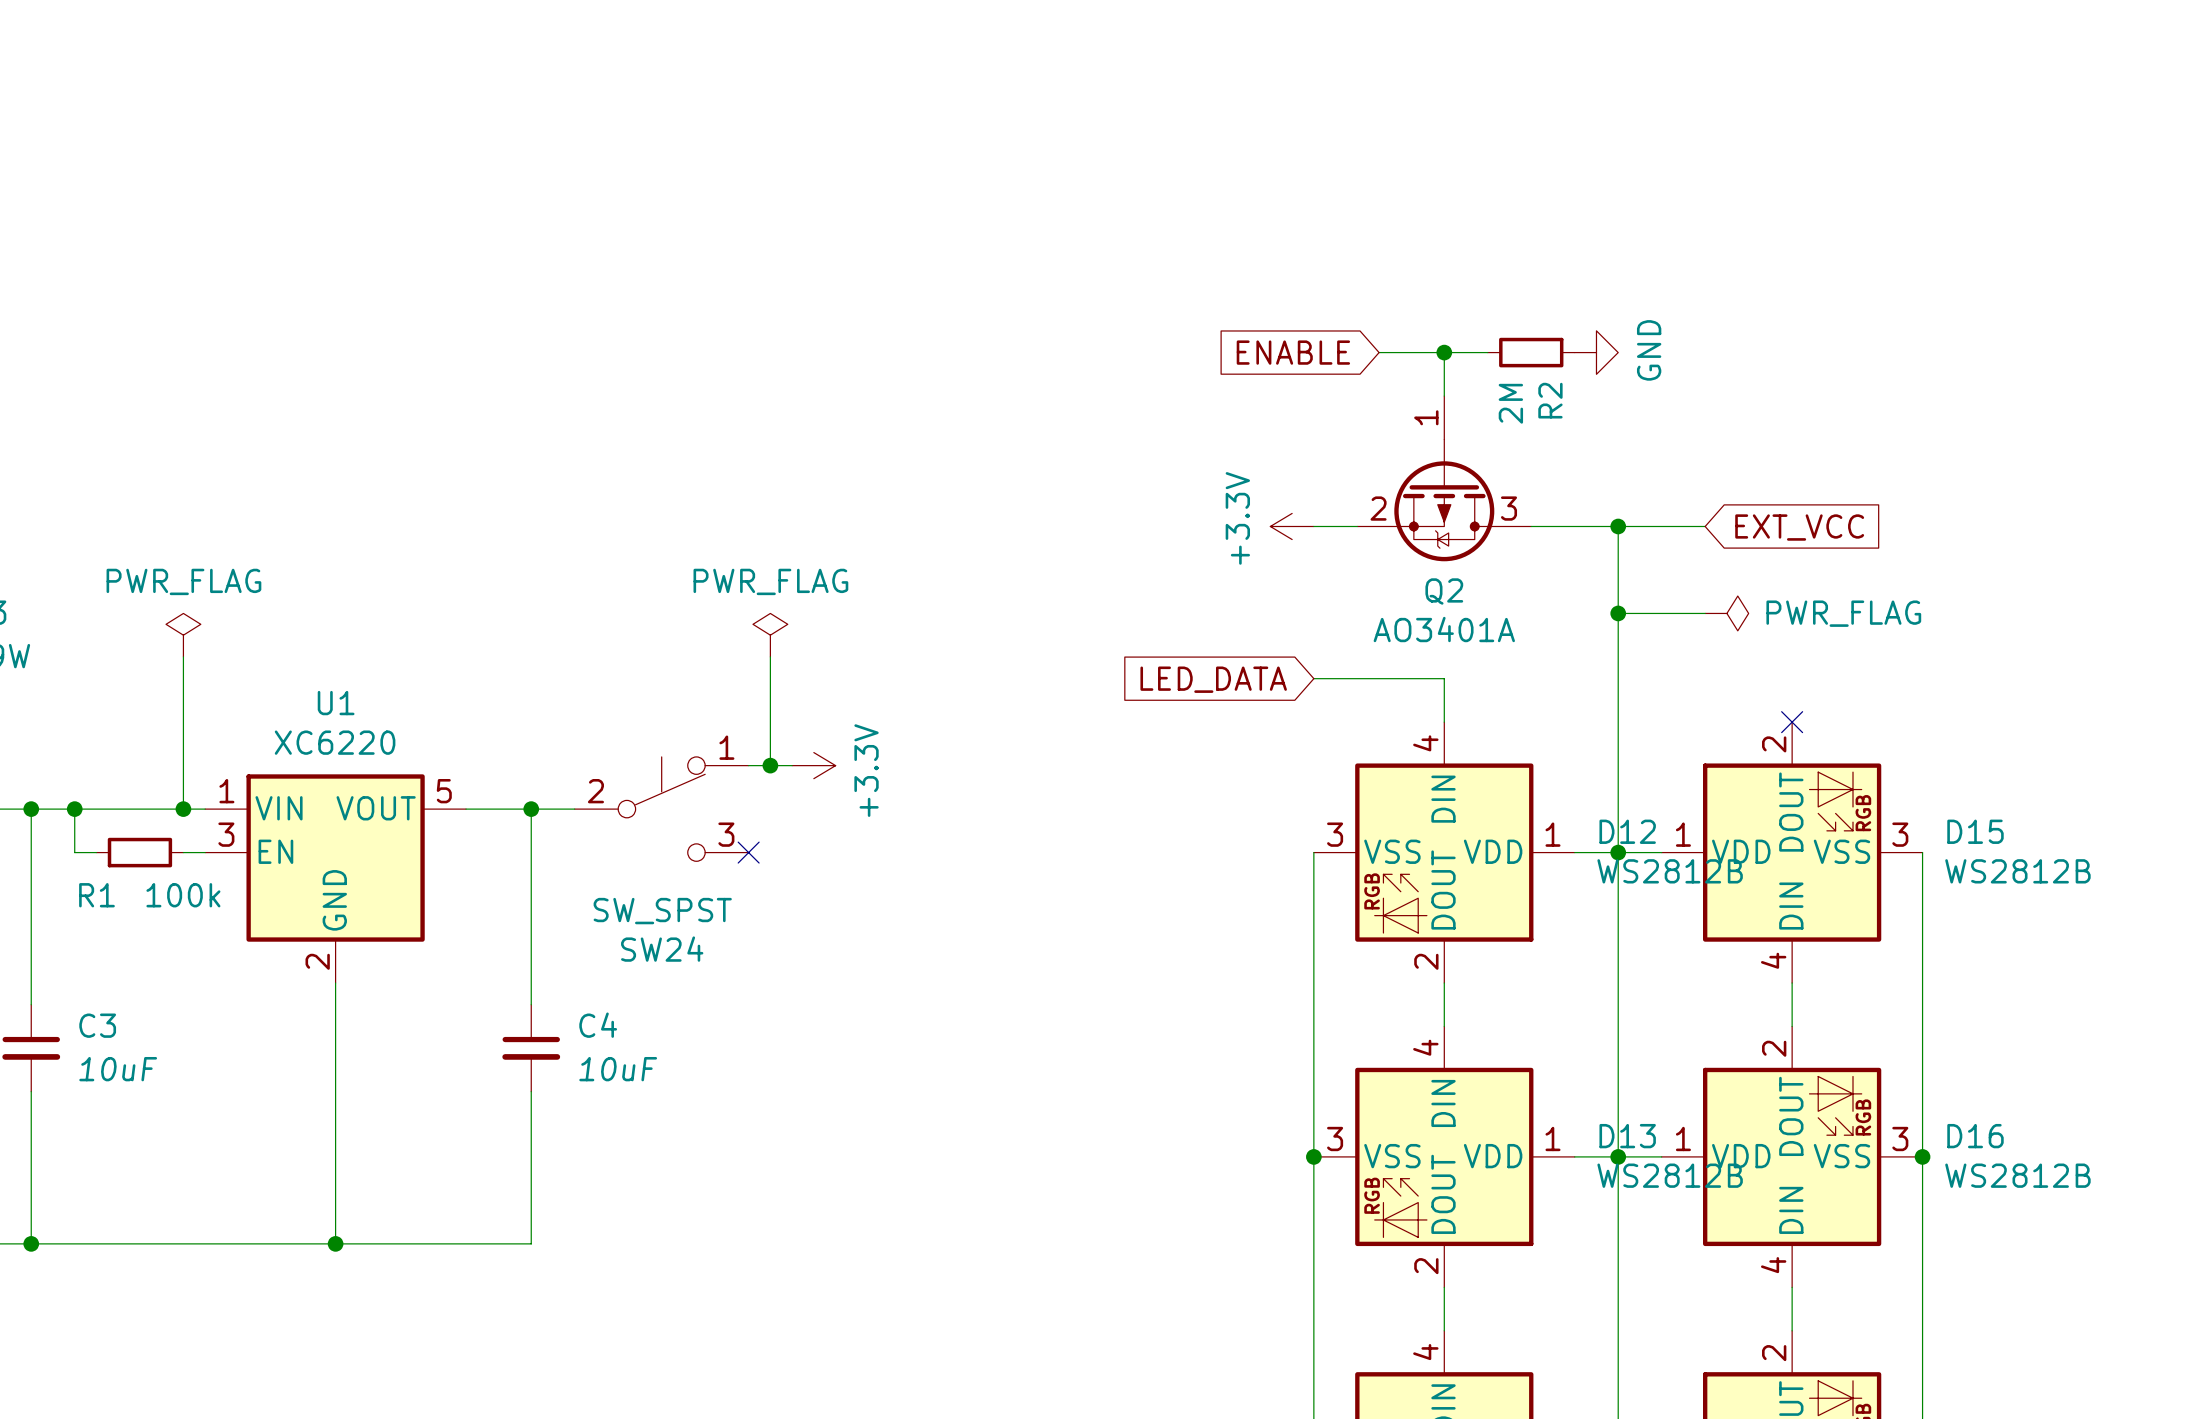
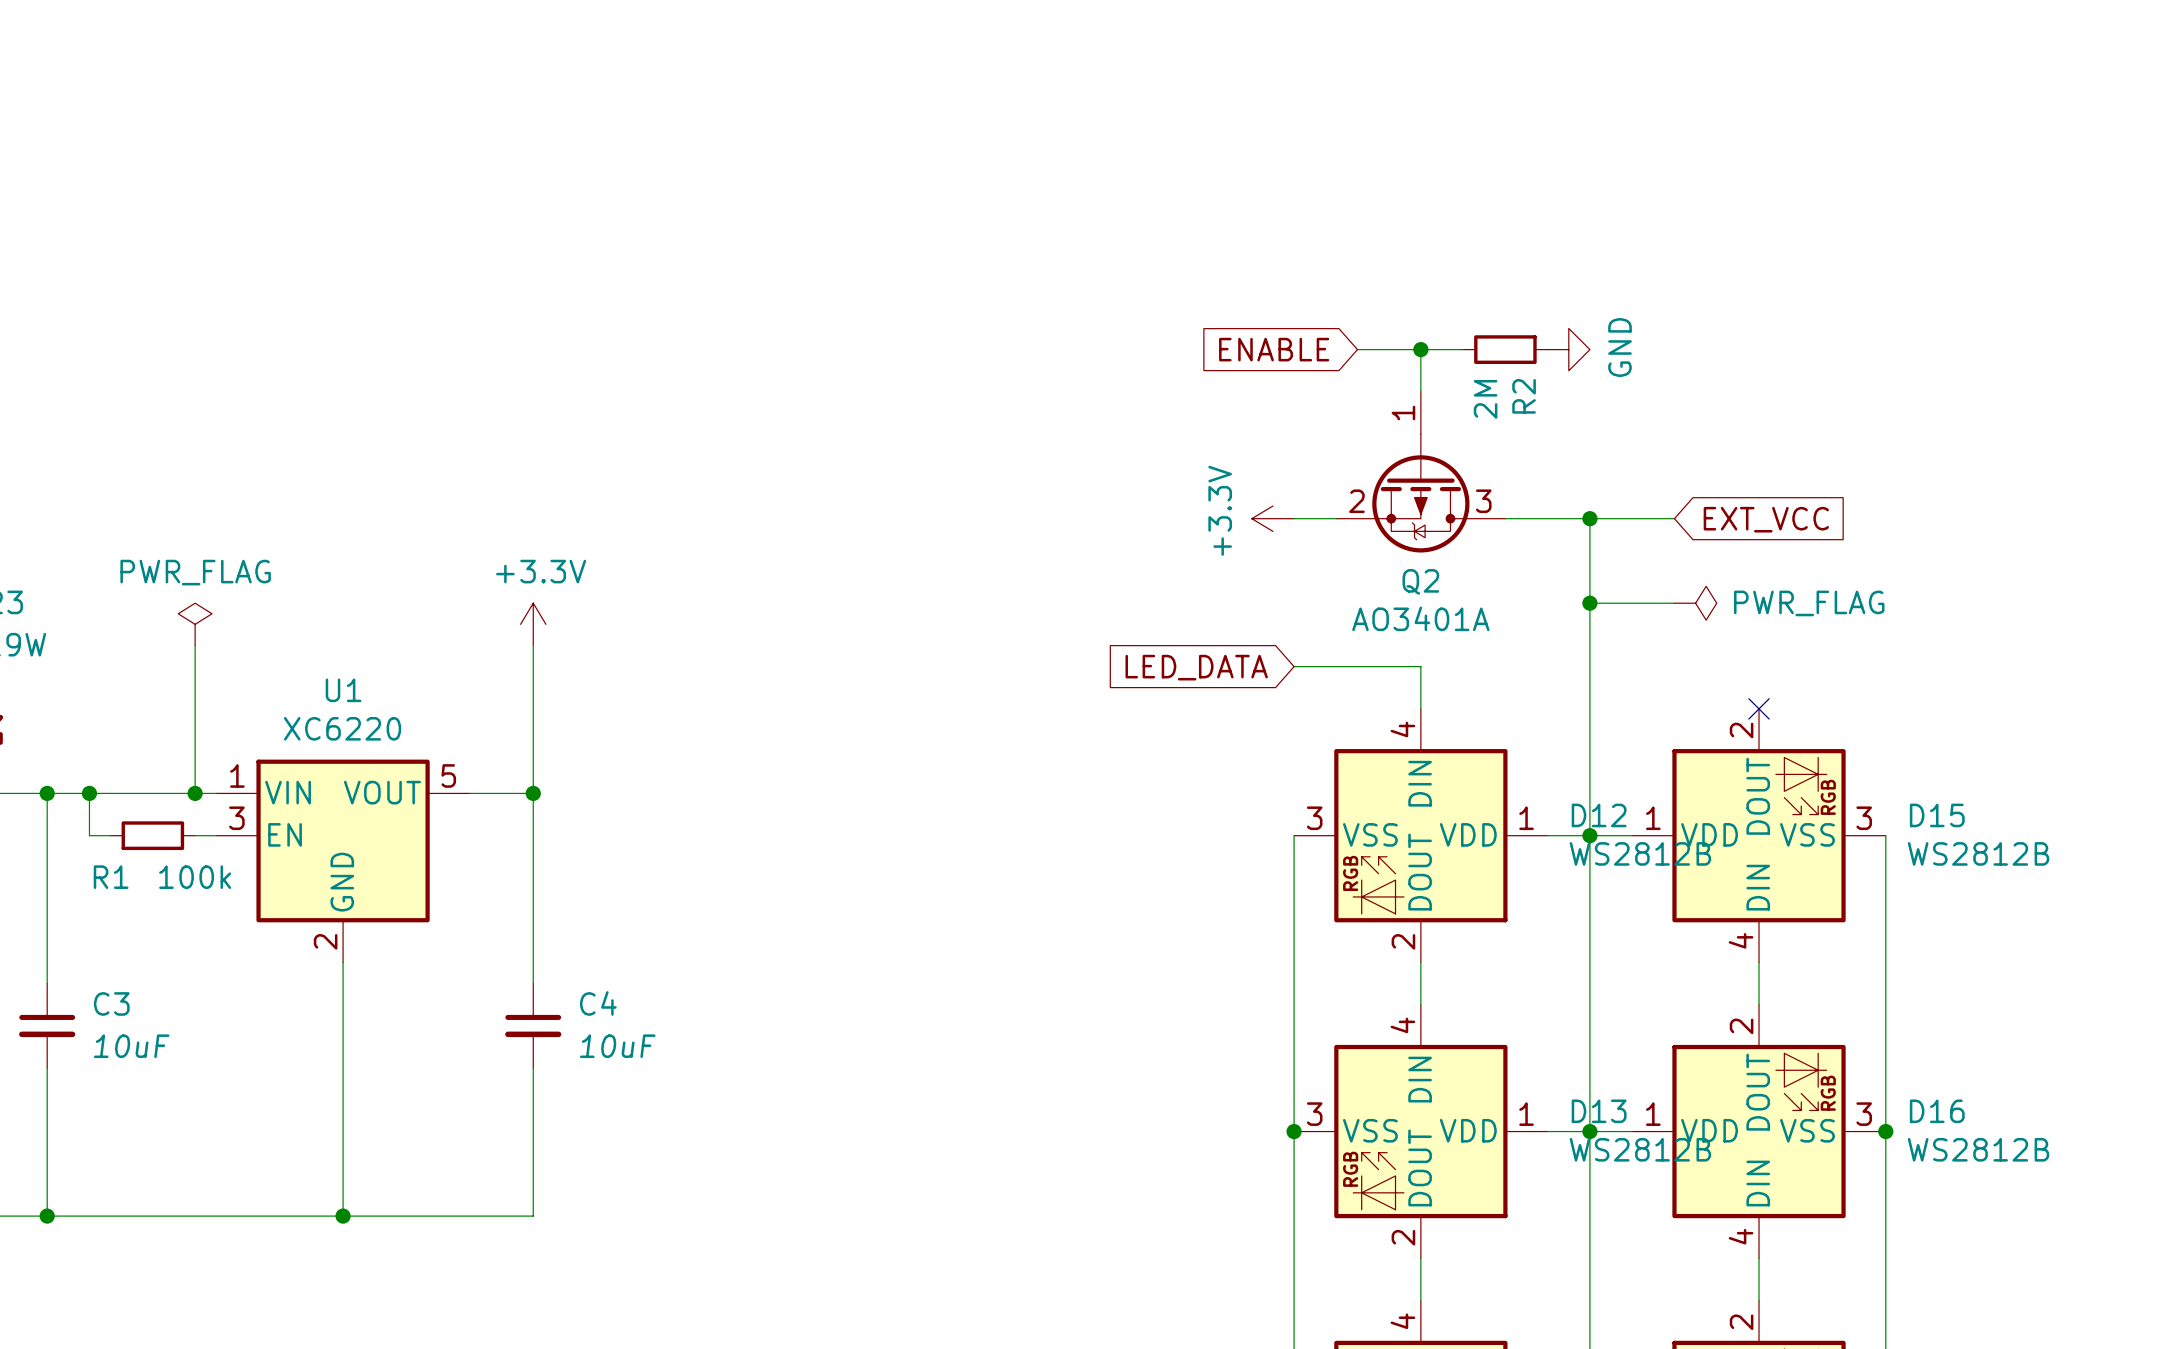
power symbol: PWR_FLAG (770, 635) -> none
wire: (770, 656) (770, 765) -> none
wire: (748, 765) (792, 765) -> none
junction: (770, 765) -> none
power symbol rotation: 0° (813, 765) -> 90° counterclockwise (533, 624)
power symbol position: +3.3V (813, 765) -> +3.3V (533, 624)
wire: (531, 809) (574, 809) -> (533, 793) (533, 645)
SW24: SW_SPST (661, 809) -> none
no-connect mark: (748, 852) -> none

